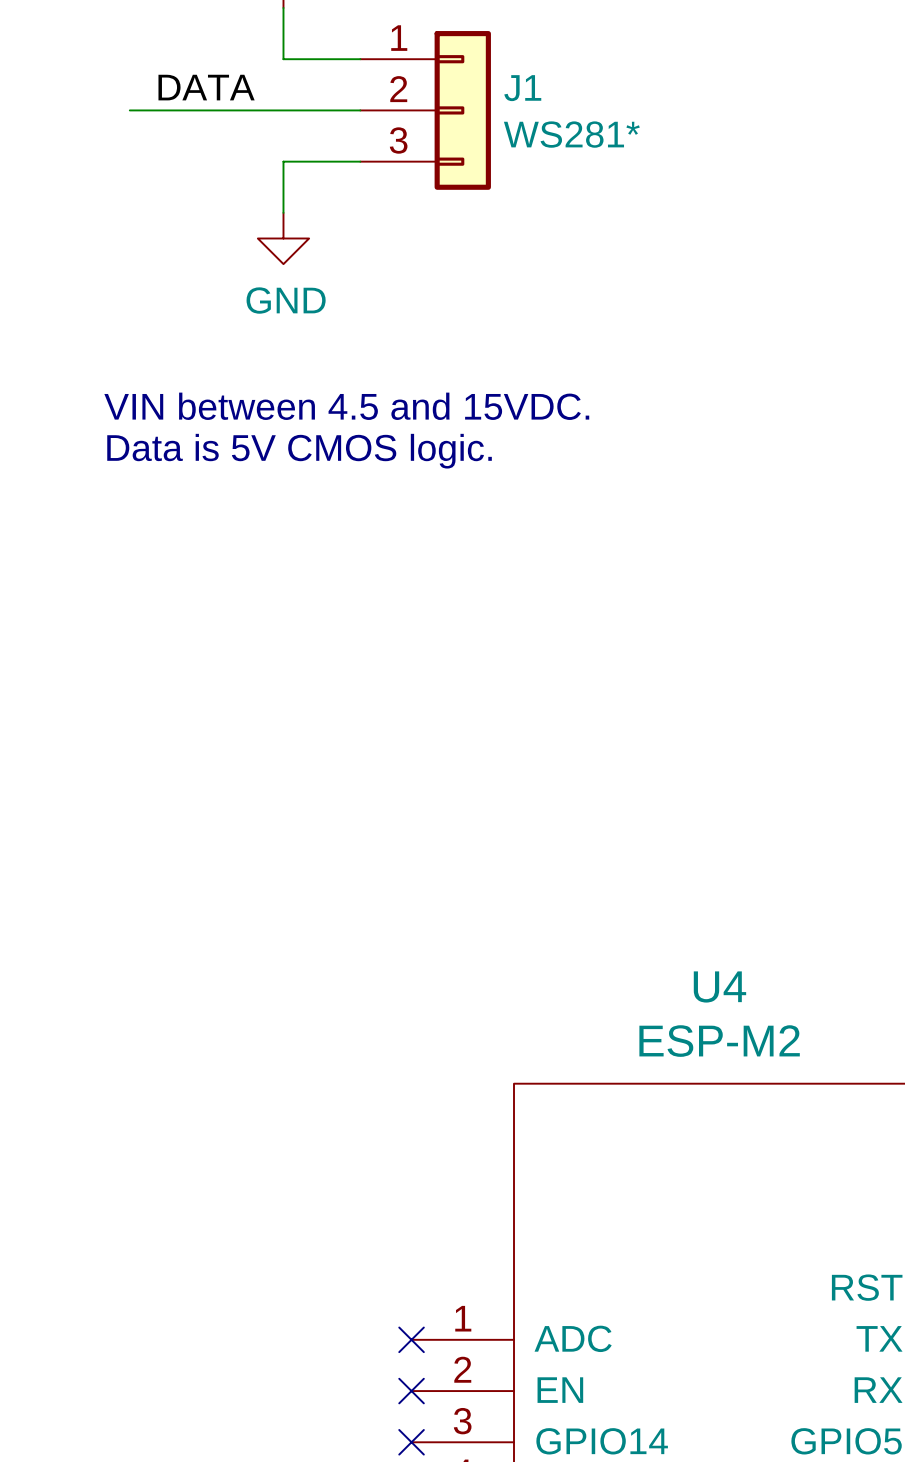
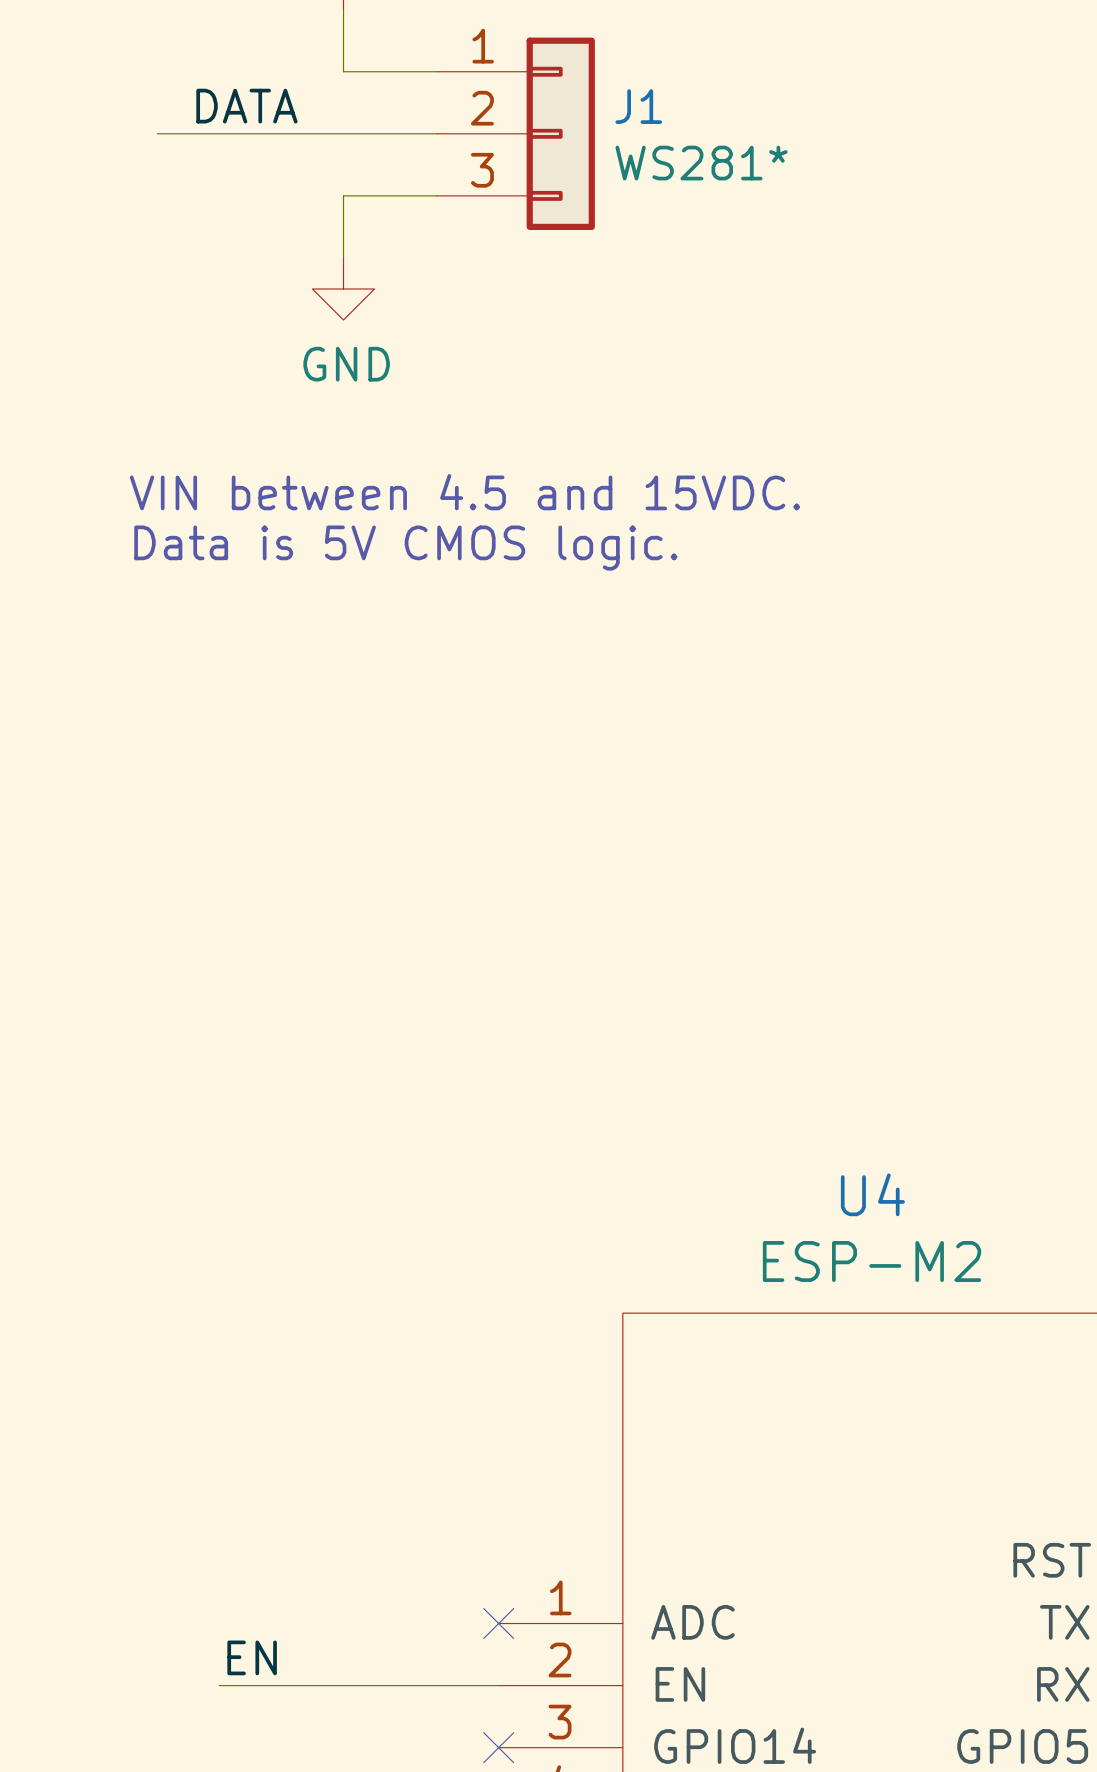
label: none -> EN (252, 1657)
wire: none -> (219, 1685) (498, 1685)
no-connect mark: (411, 1391) -> none

